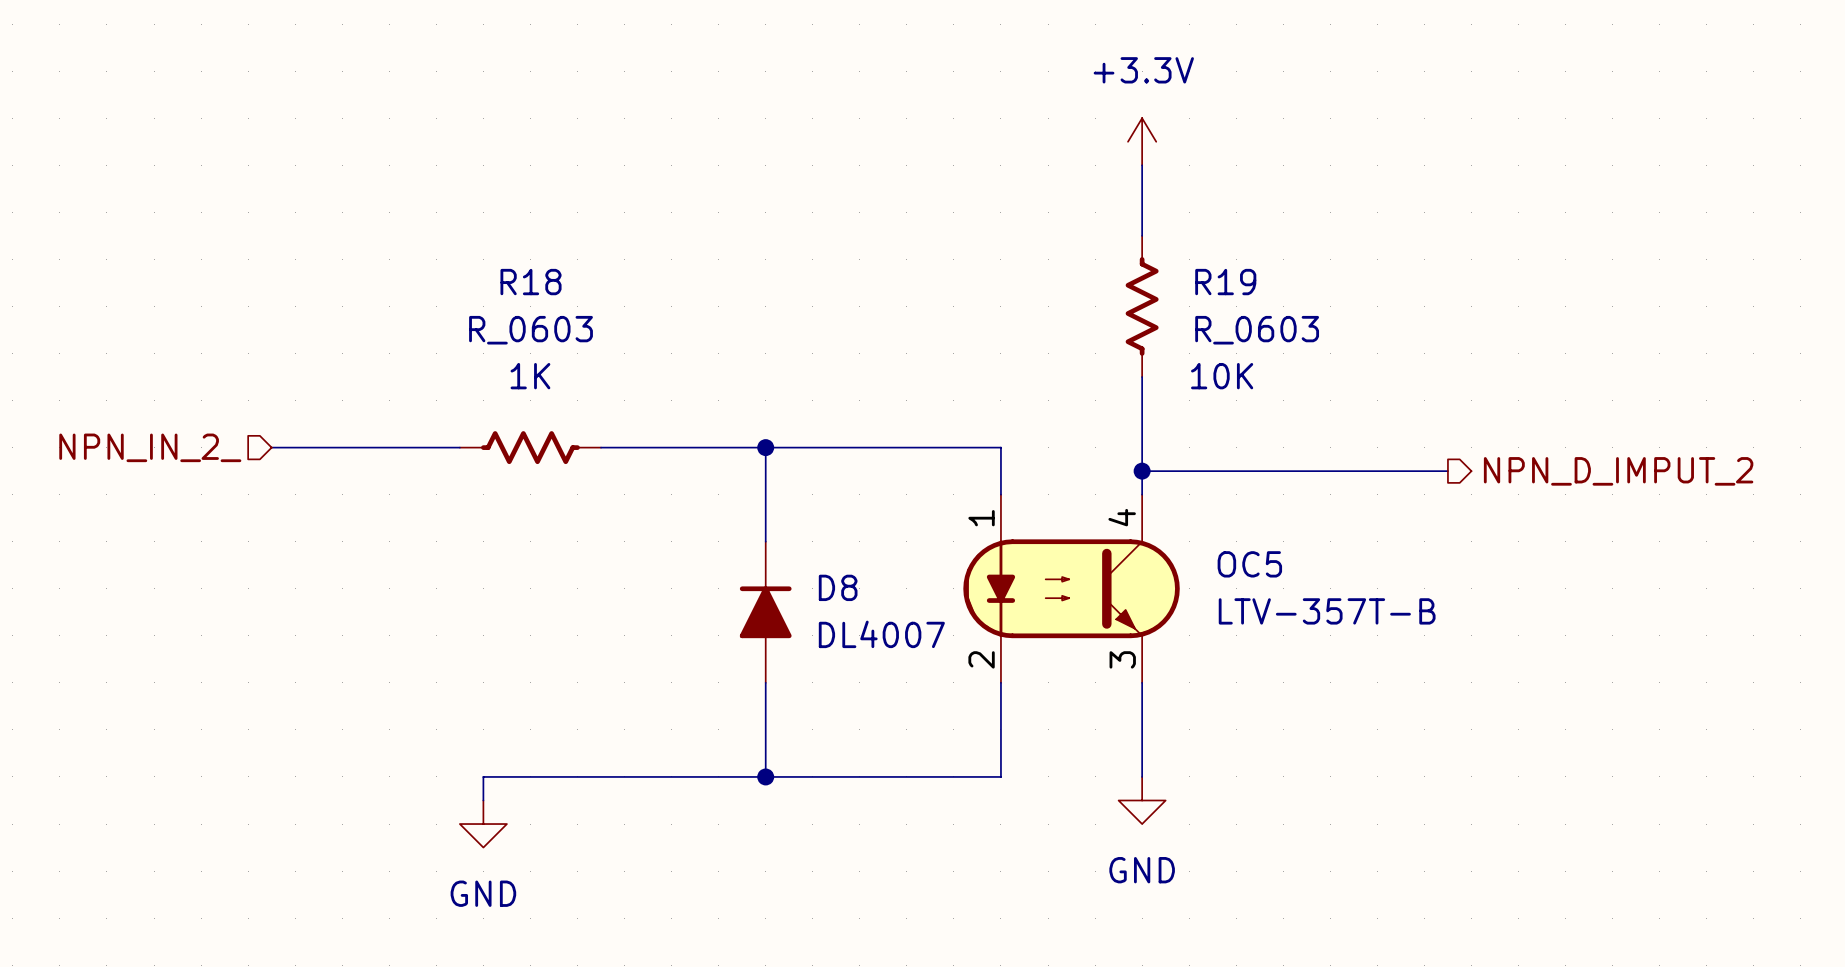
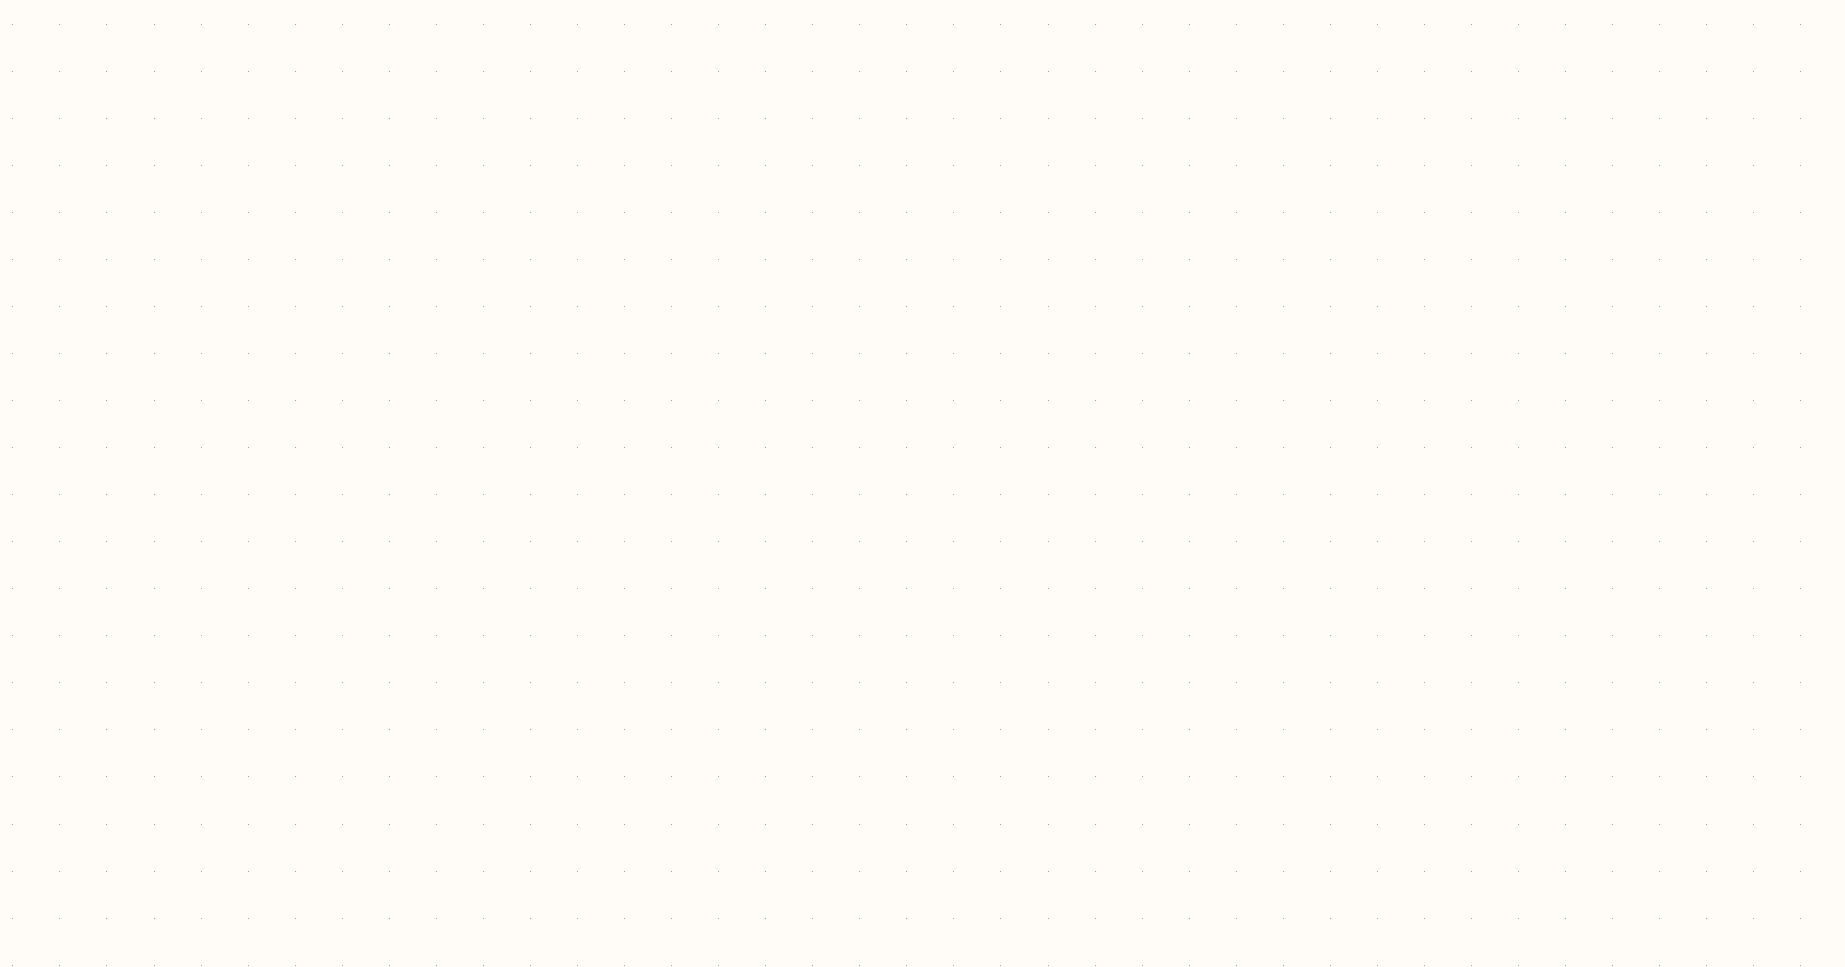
power symbol: +3.3V (1142, 141) -> none
wire: (1142, 165) (1142, 235) -> none
R19: R_0603 (1142, 306) -> none
wire: (1142, 377) (1142, 494) -> none
hierarchical label: NPN_IN_2_ (150, 447) -> none
wire: (271, 447) (459, 447) -> none
R18: R_0603 (530, 447) -> none
wire: (601, 447) (1000, 447) (1000, 494) -> none
wire: (765, 447) (765, 541) -> none
junction: (765, 447) -> none
wire: (1142, 471) (1447, 471) -> none
junction: (1142, 471) -> none
hierarchical label: NPN_D_IMPUT_2 (1618, 471) -> none
OC5: LTV-357T-B (1071, 588) -> none
D8: DL4007 (765, 612) -> none
wire: (765, 682) (765, 776) -> none
wire: (1000, 682) (1000, 776) (483, 776) (483, 800) -> none
wire: (1142, 682) (1142, 776) -> none
junction: (765, 776) -> none
power symbol: GND (1142, 800) -> none
power symbol: GND (483, 824) -> none

